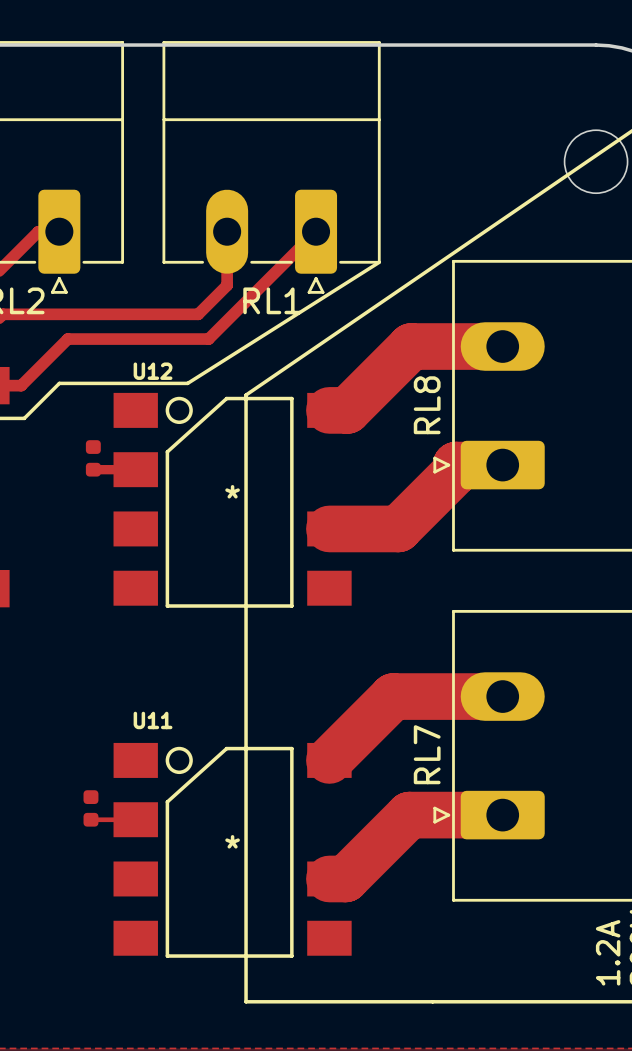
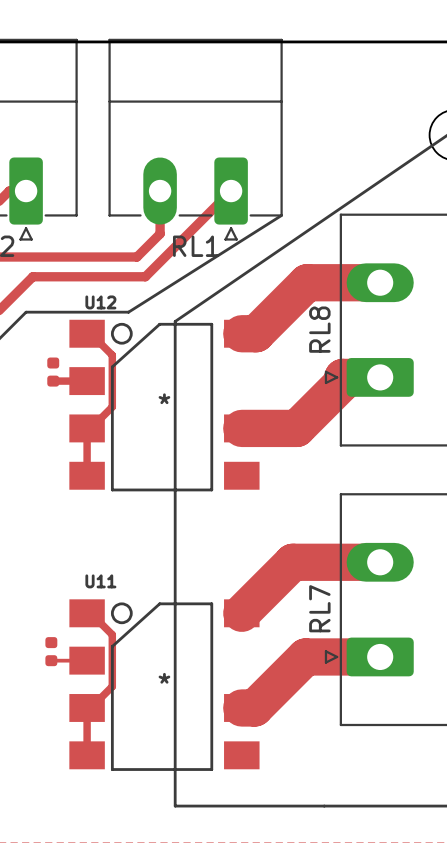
track: none -> (87, 333) (90, 333) (112, 355) (112, 407) (90, 428) (87, 428) (87, 475)
track: none -> (87, 613) (90, 613) (112, 634) (112, 686) (90, 707) (87, 707) (87, 755)

